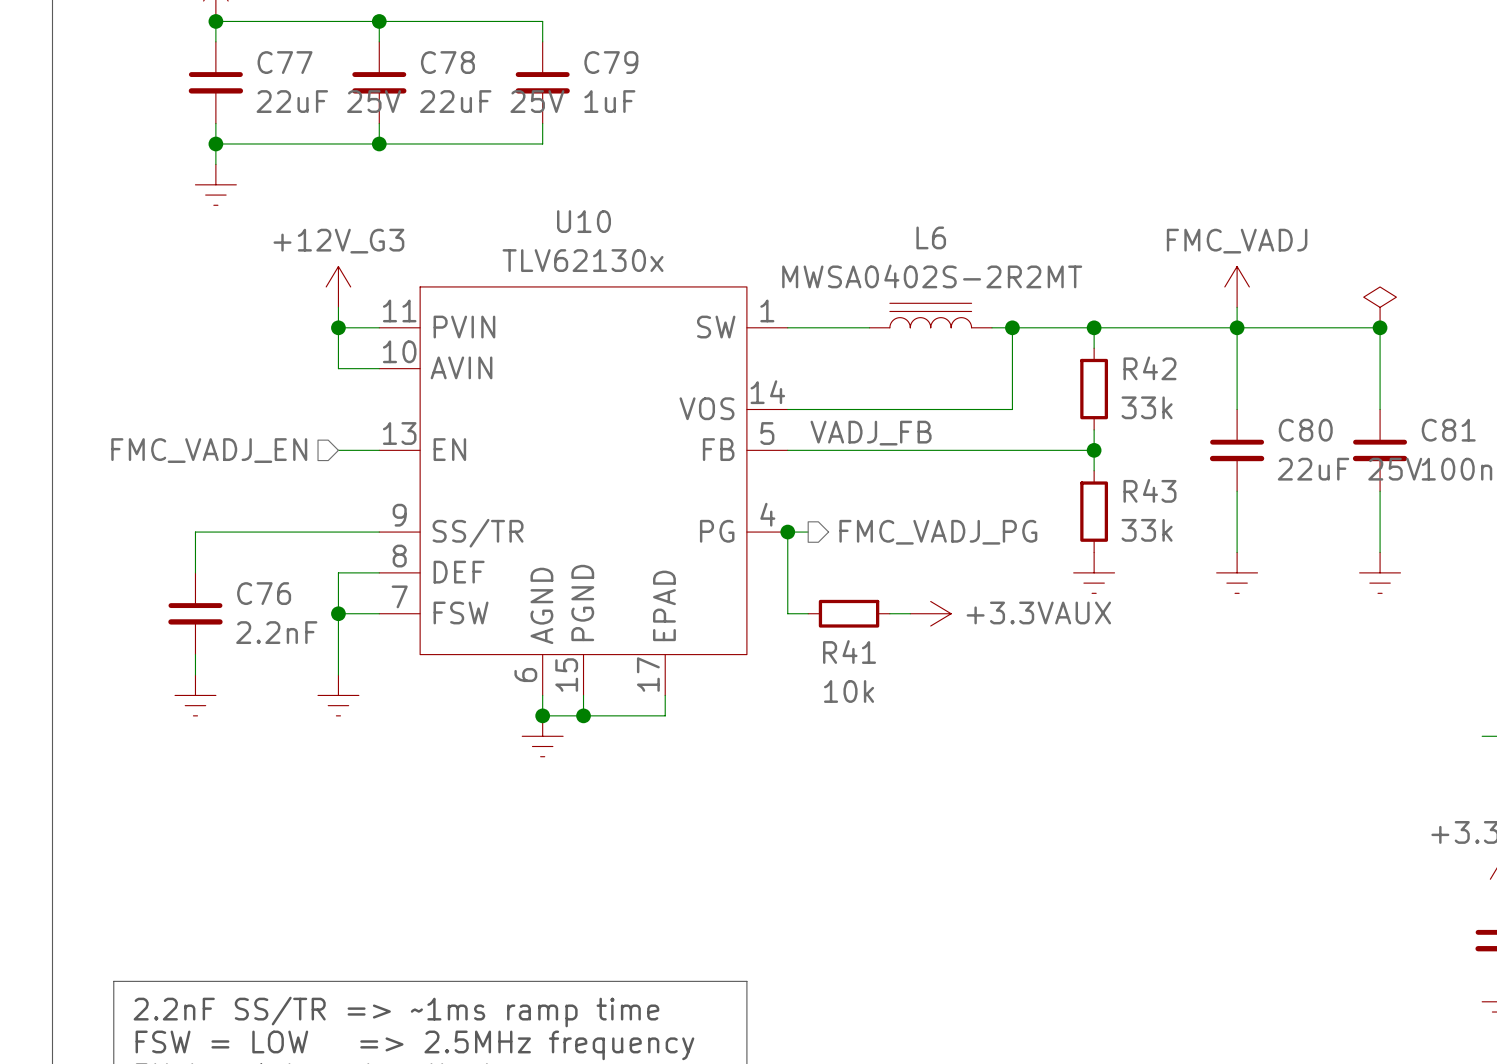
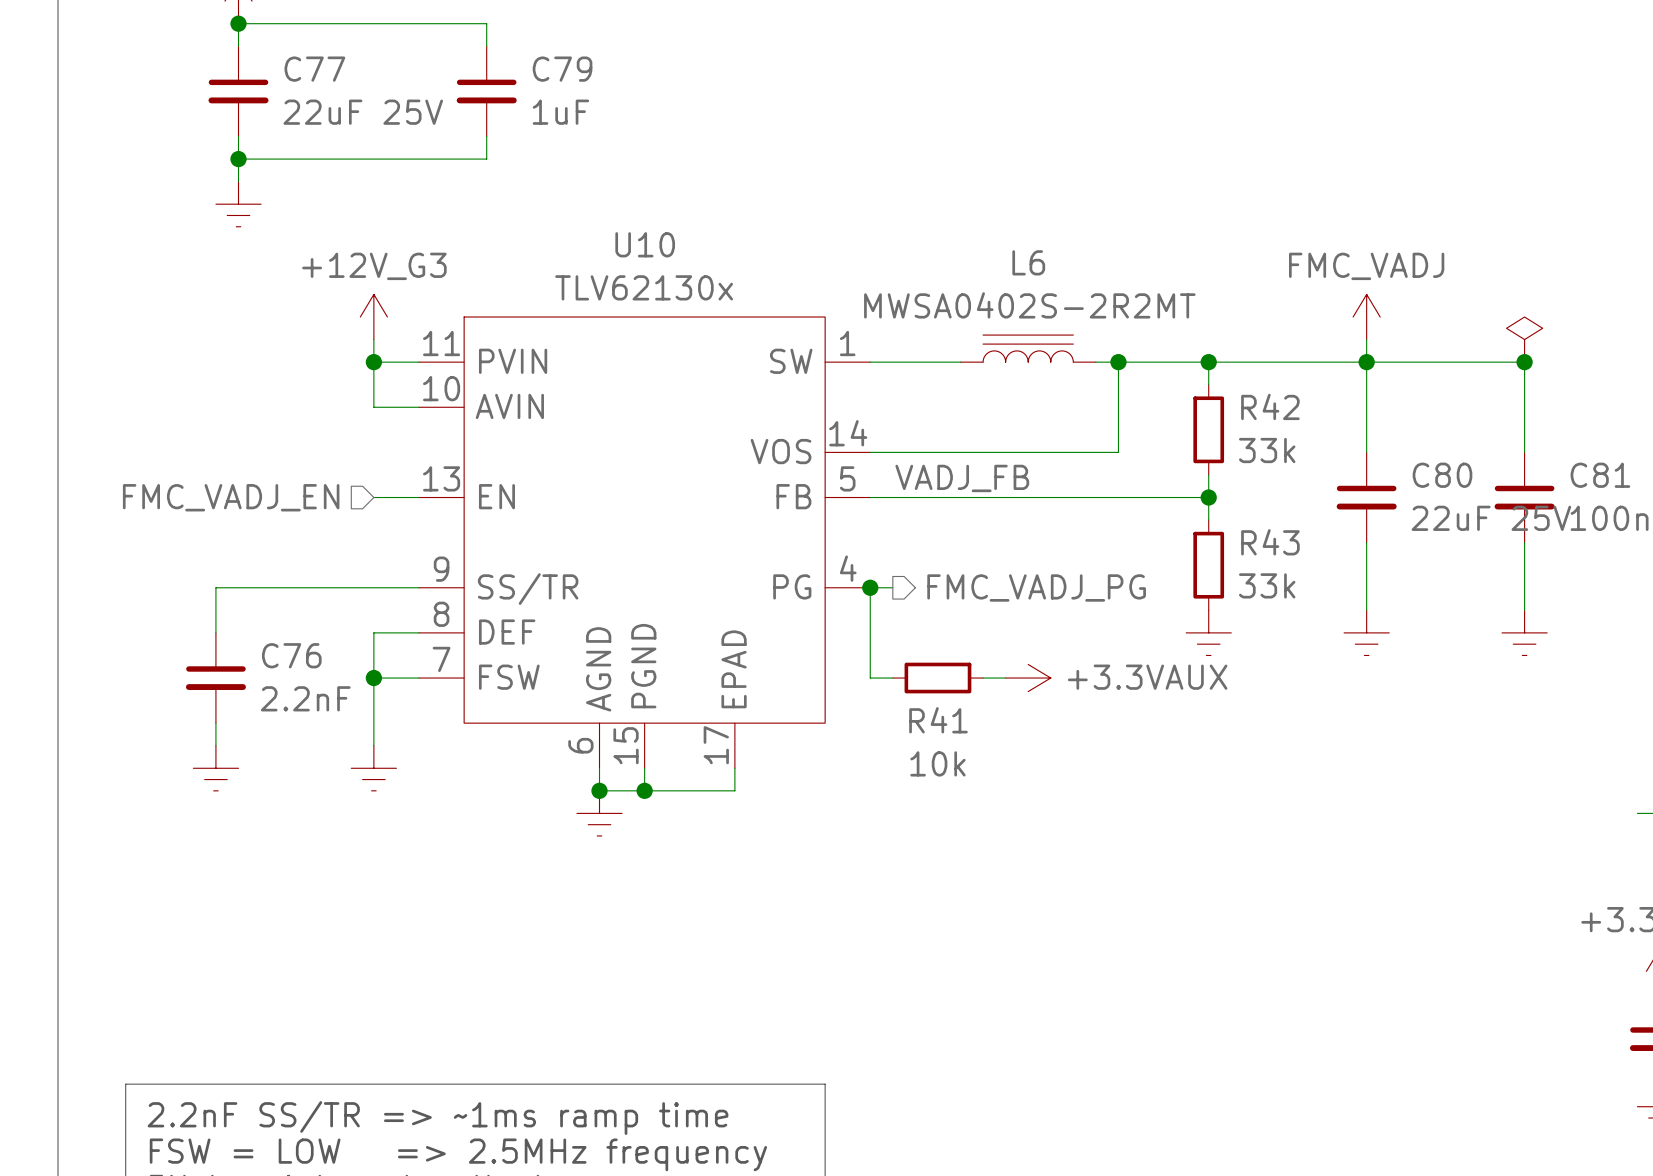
wire: (379, 21) (379, 41) -> none
junction: (379, 21) -> none
wire: (440, 21) (542, 21) (542, 41) -> (486, 23) (486, 46)
C78: 22uF 25V (379, 82) -> none
C79 position: (542, 82) -> (486, 91)
wire: (379, 123) (379, 143) -> none
wire: (542, 123) (542, 143) (440, 143) -> (486, 136) (486, 159)
junction: (379, 143) -> none

